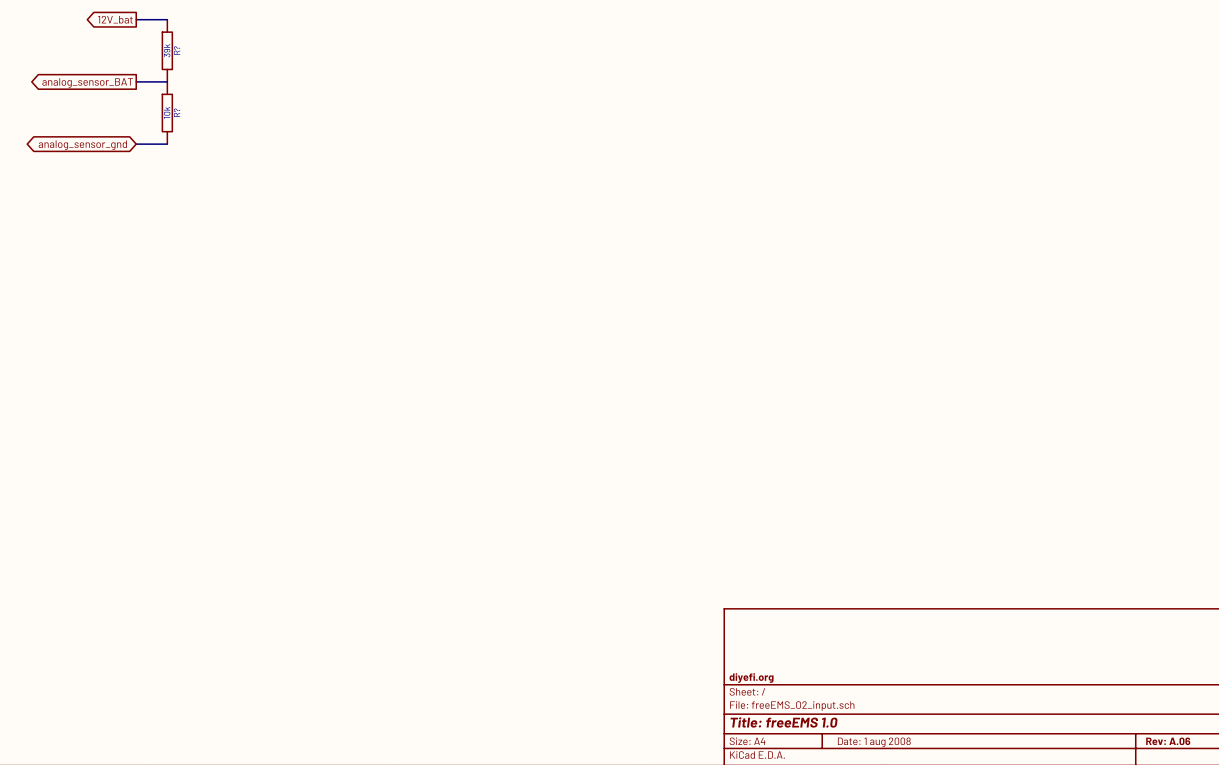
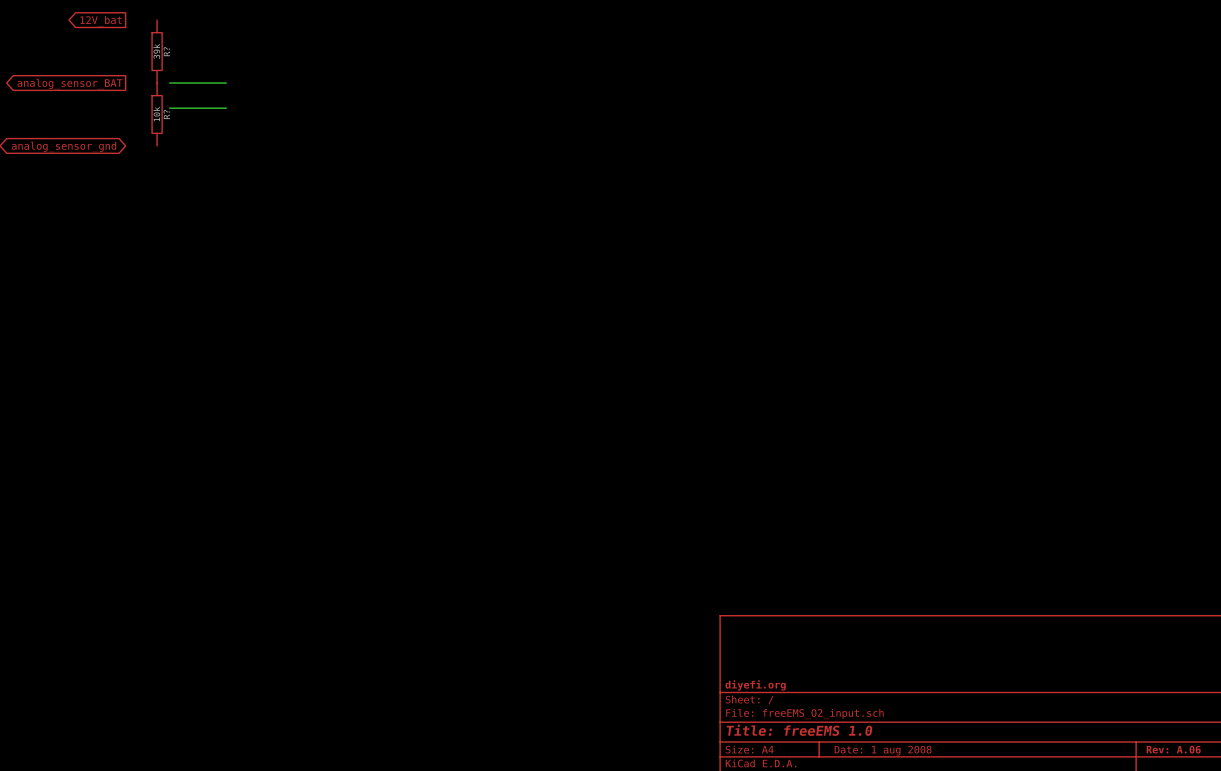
wire: (136, 19) (167, 19) -> none
wire: (136, 81) (167, 81) -> none
wire: none -> (169, 83) (226, 83)
wire: none -> (169, 108) (226, 108)
wire: (136, 144) (167, 144) -> none

